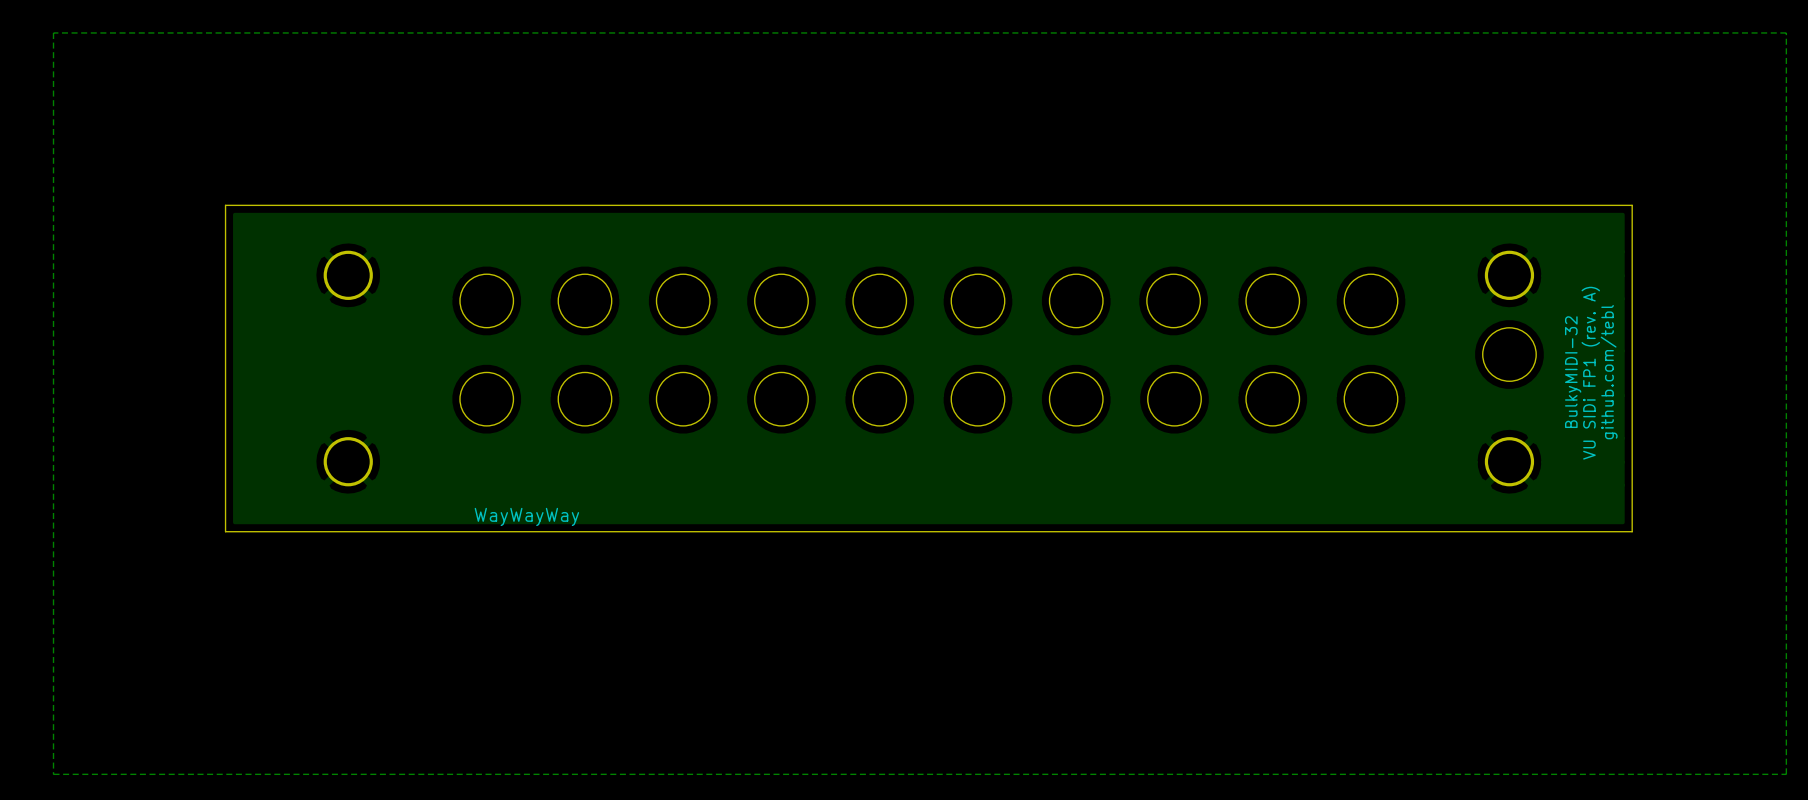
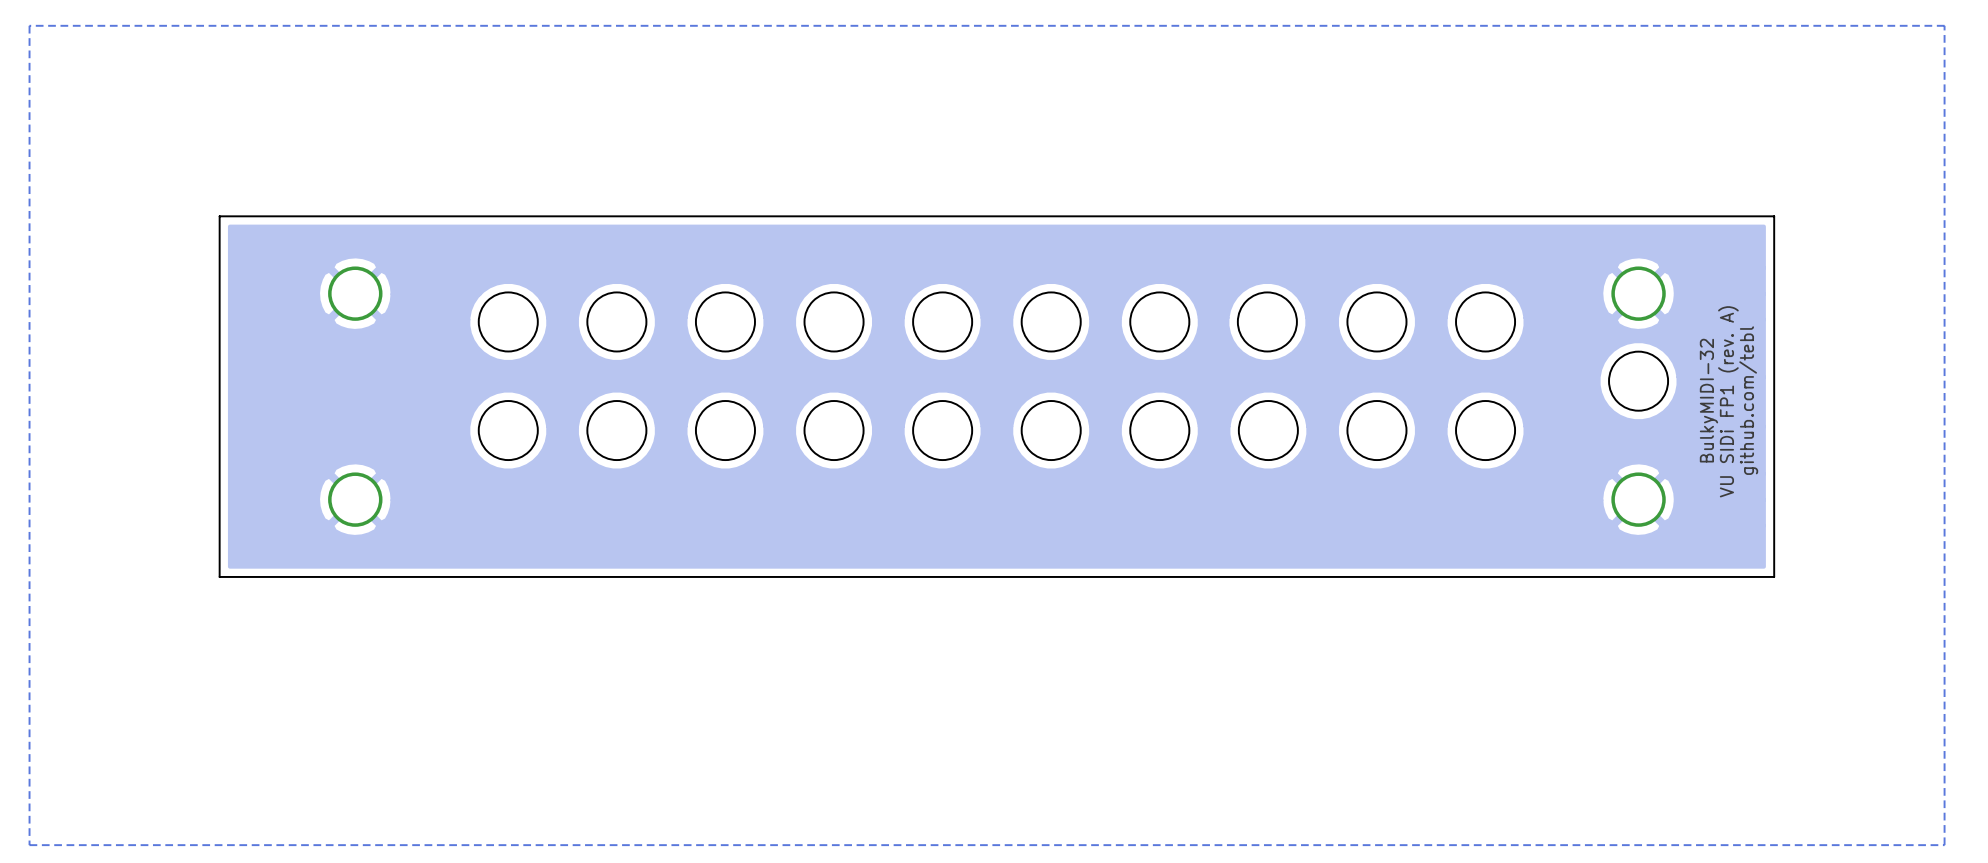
text: WayWayWay (526, 516) -> none

